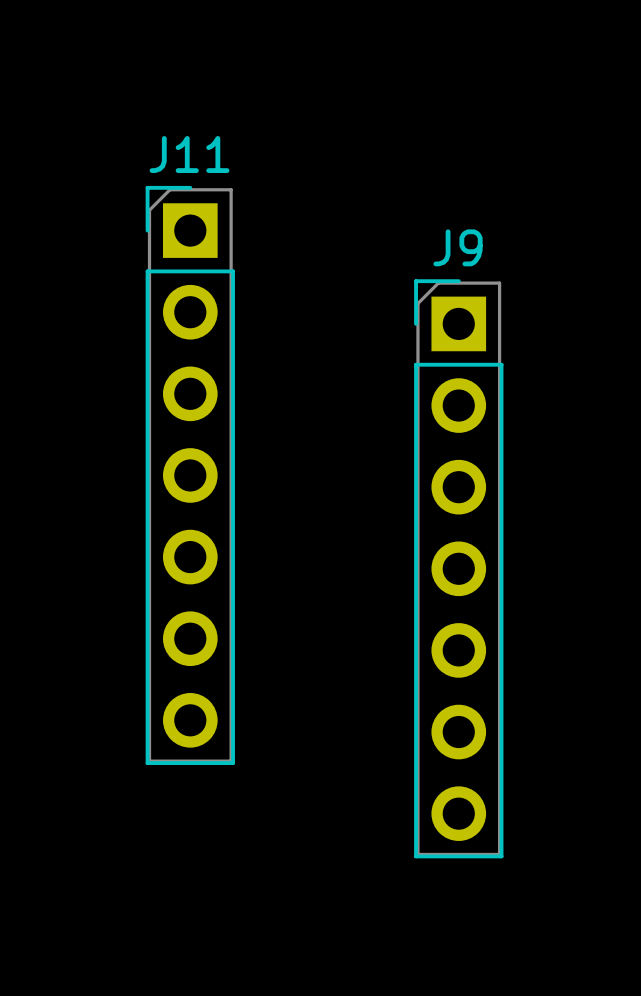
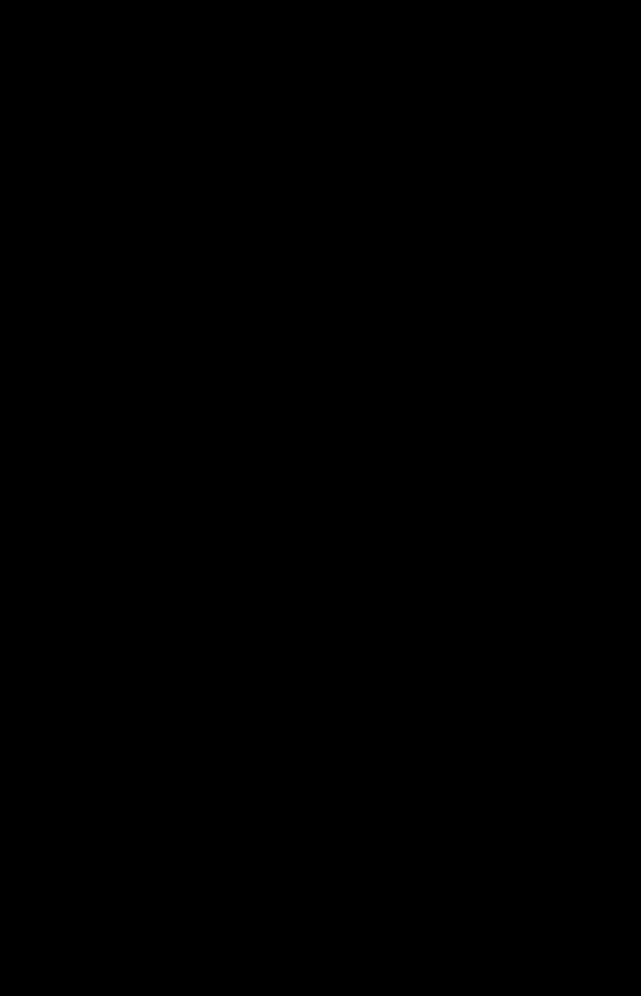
J11: (190, 475) -> none
J9: (458, 568) -> none

